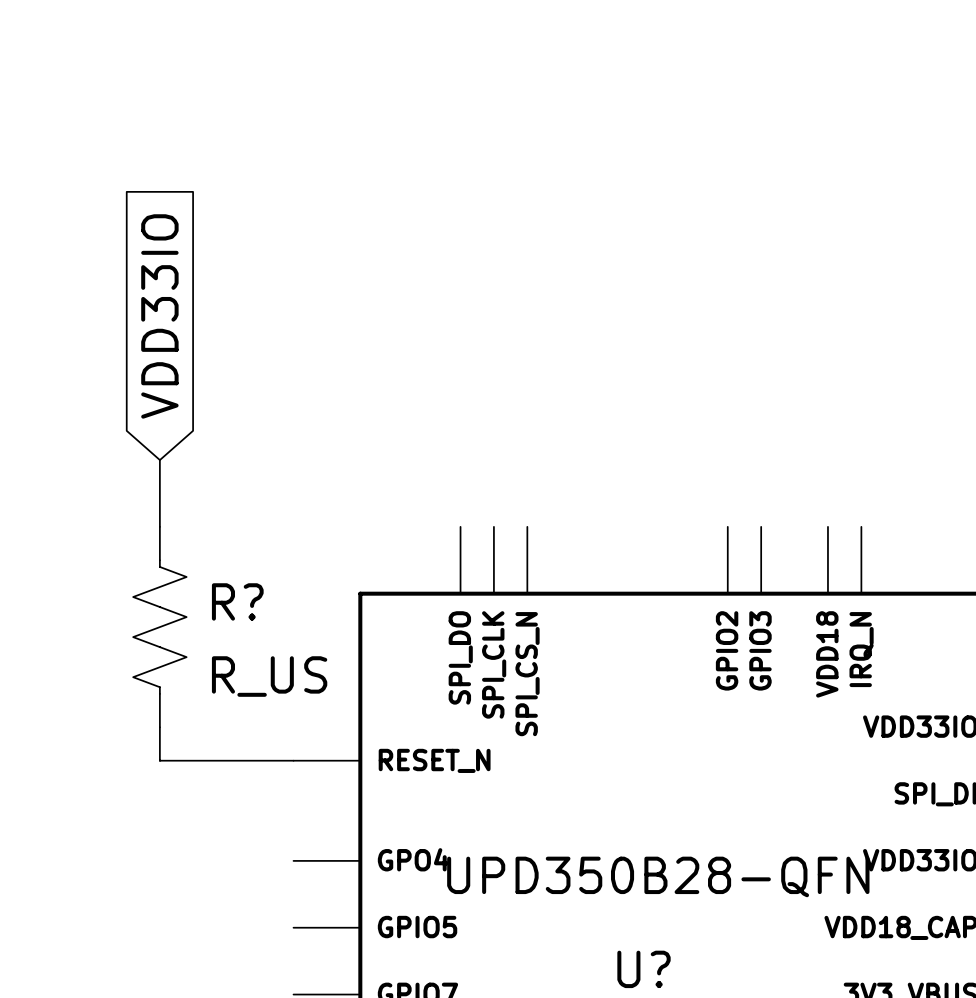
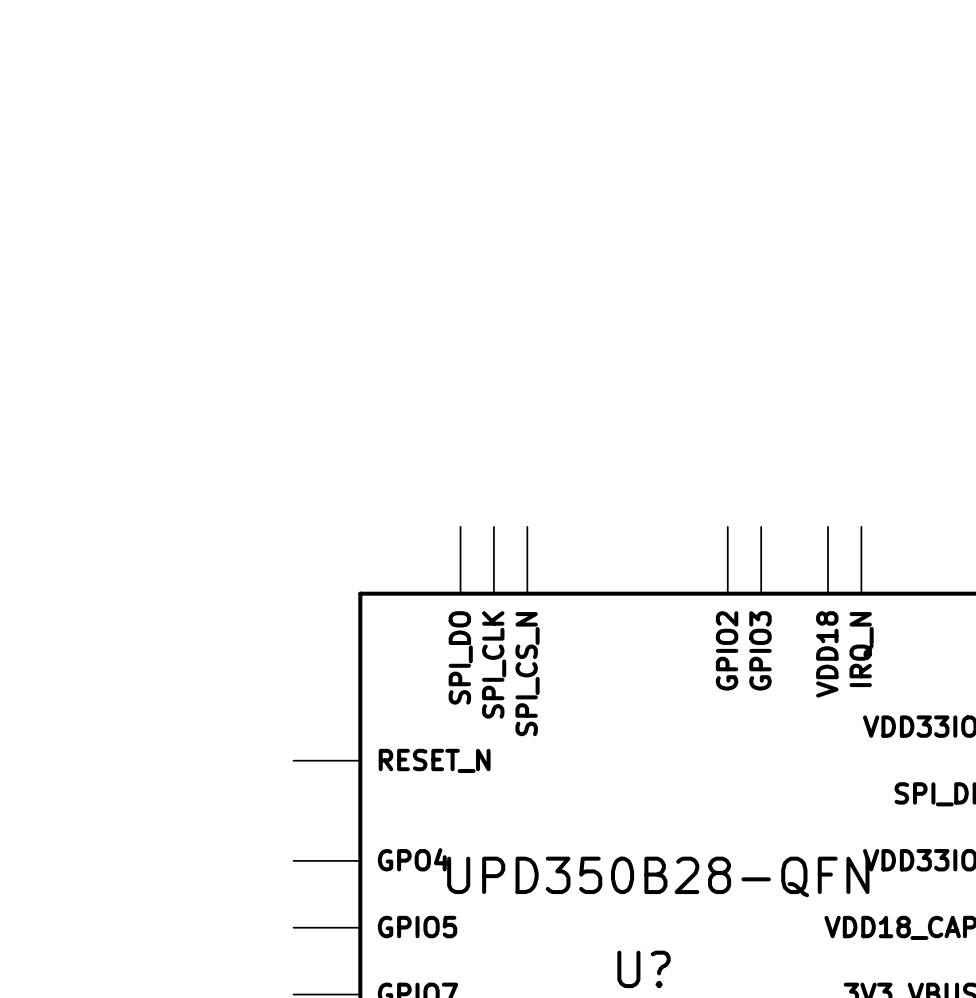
global label: VDD33IO (159, 316) -> none
wire: (159, 460) (159, 526) -> none
R?: R_US (159, 627) -> none
wire: (159, 727) (159, 760) (293, 760) -> none

